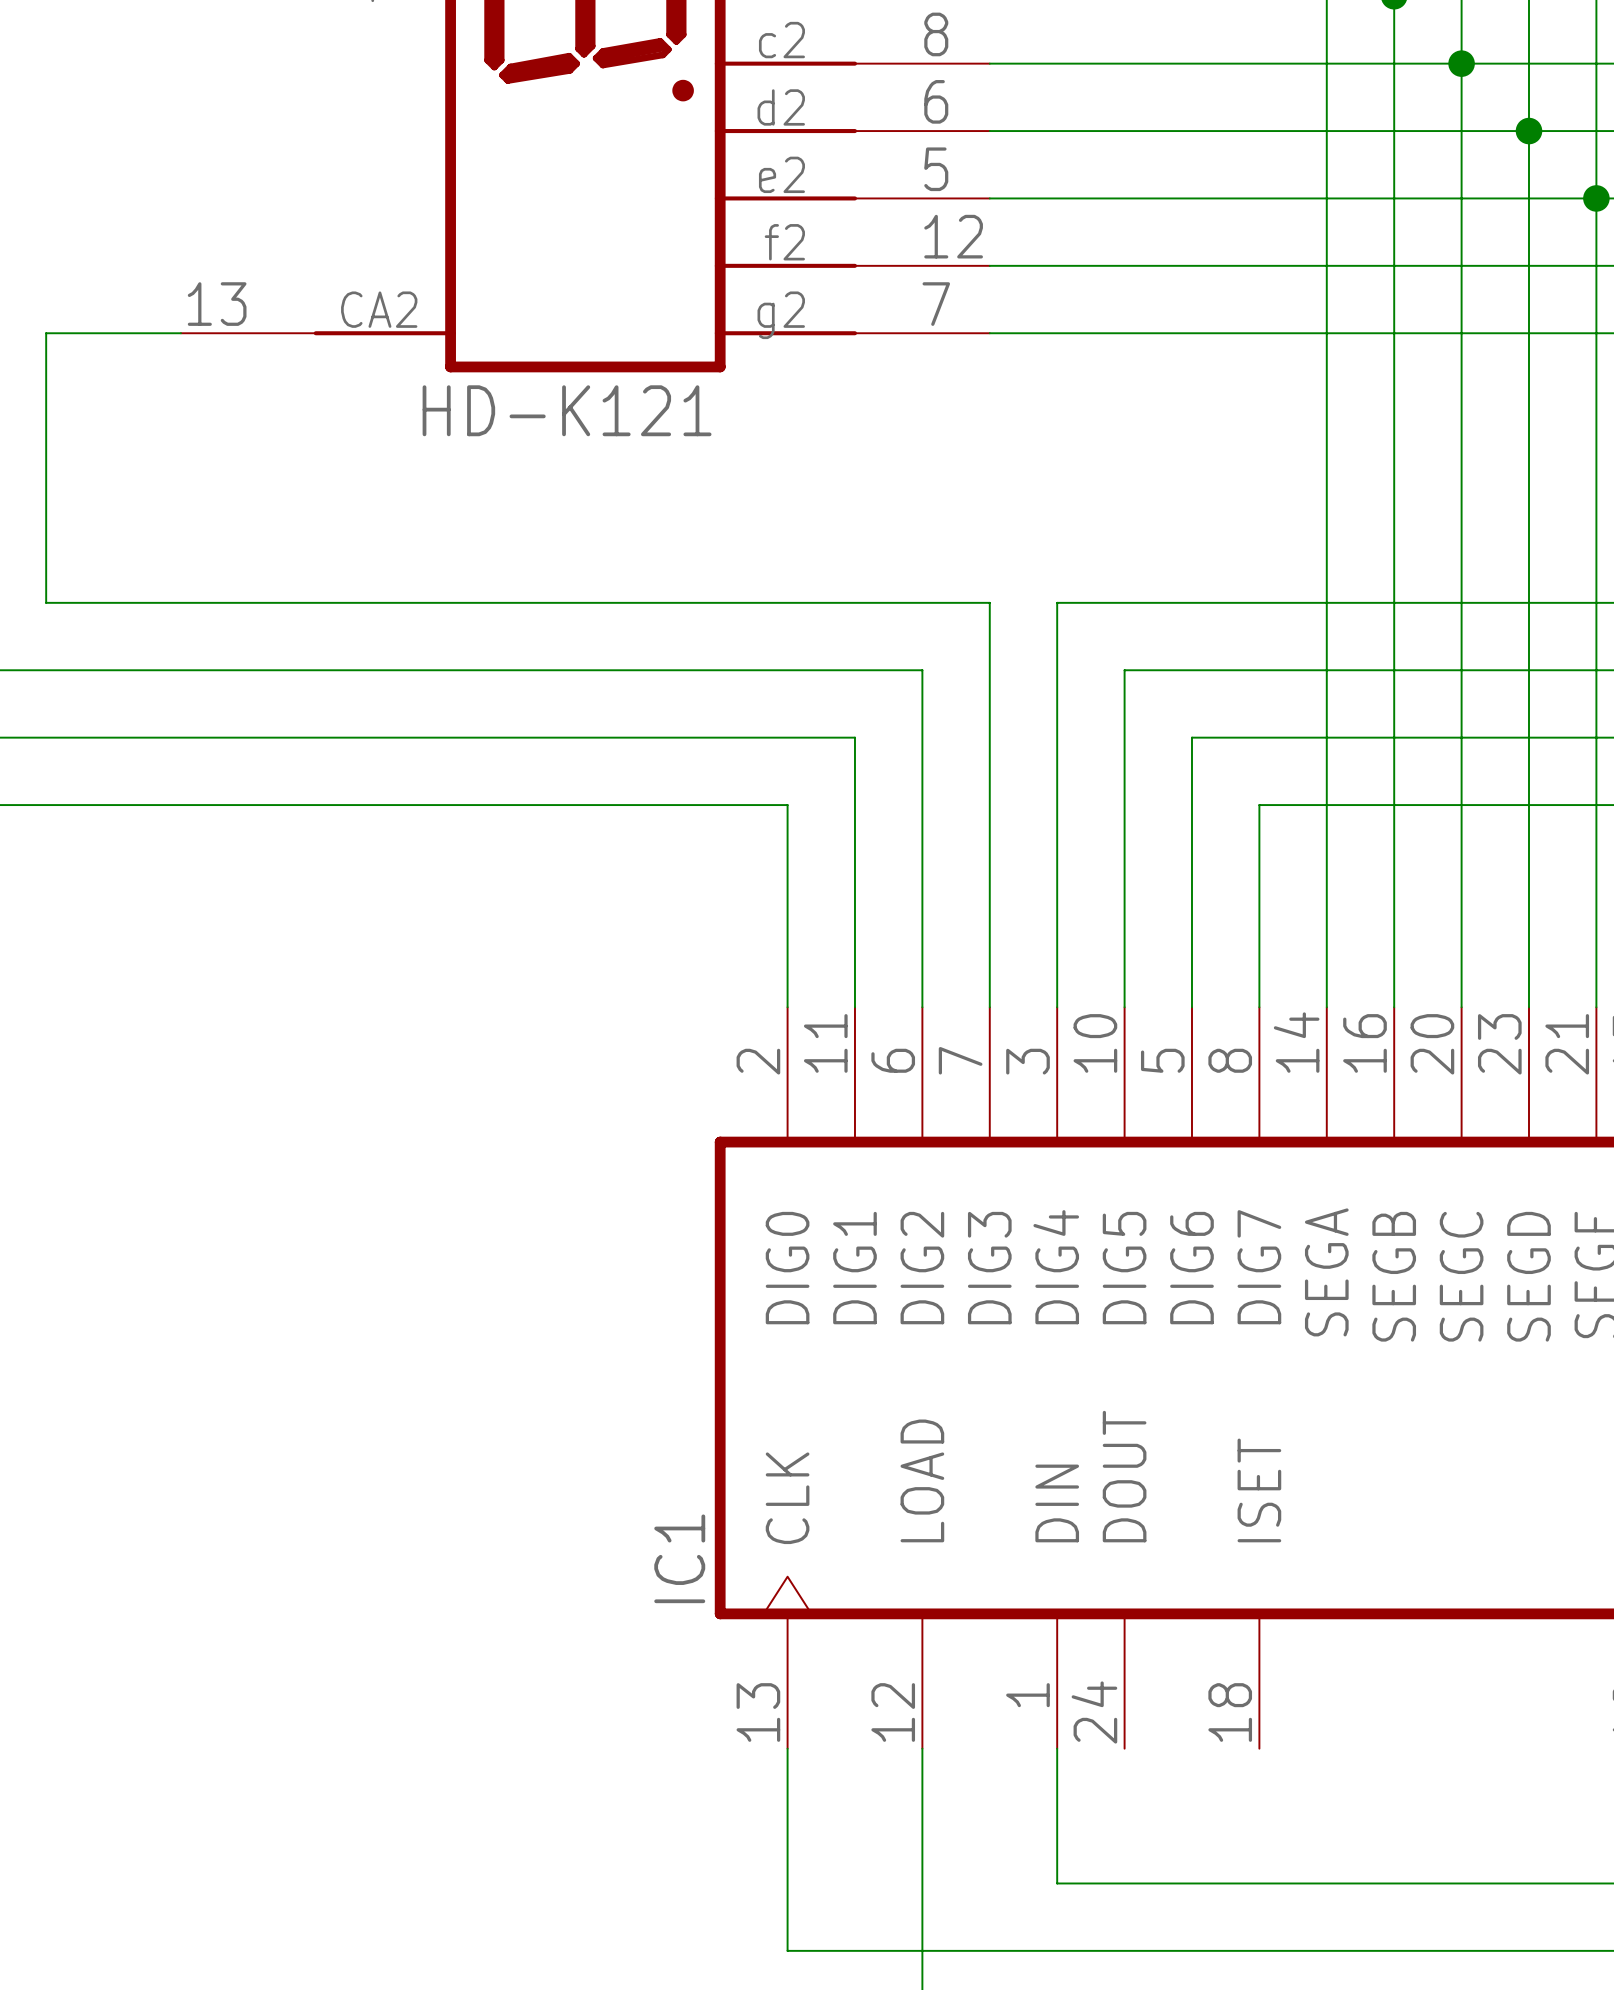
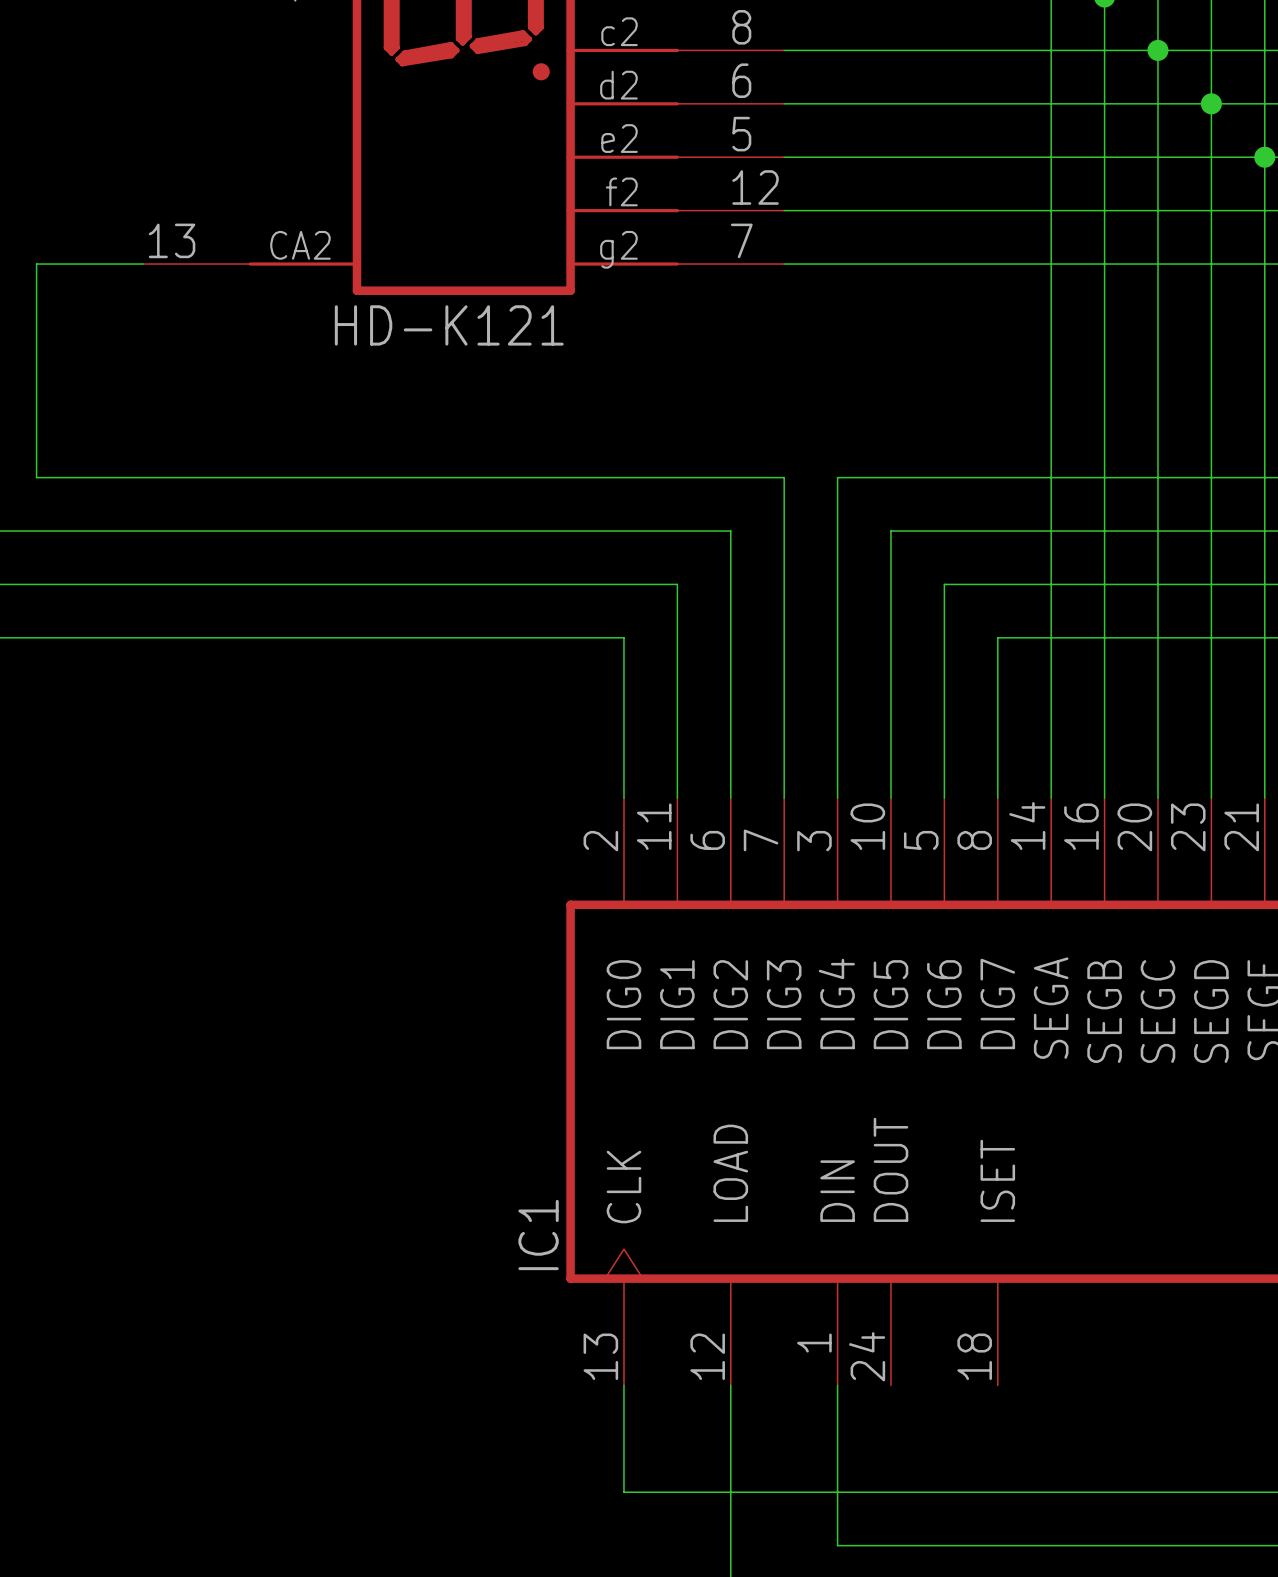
wire: (787, 1883) (787, 1950) (1057, 1950) -> (623, 1492) (837, 1492) (837, 1545)

